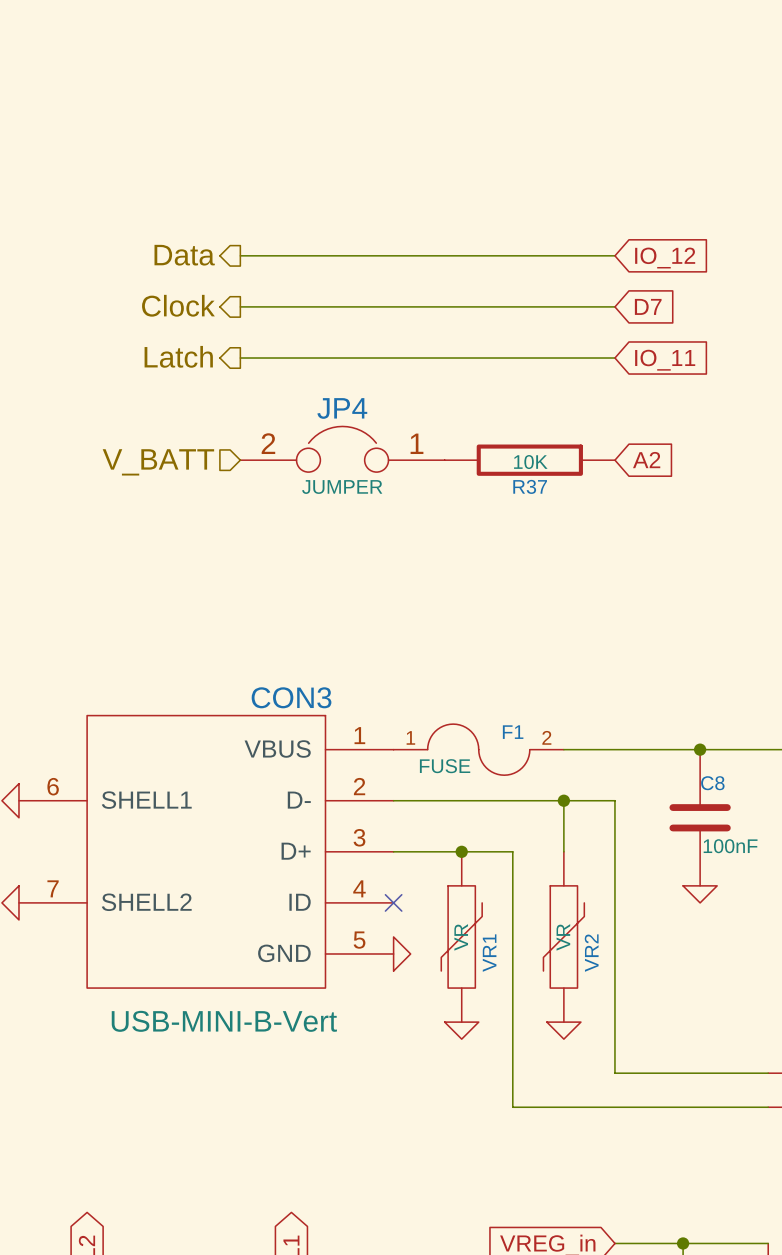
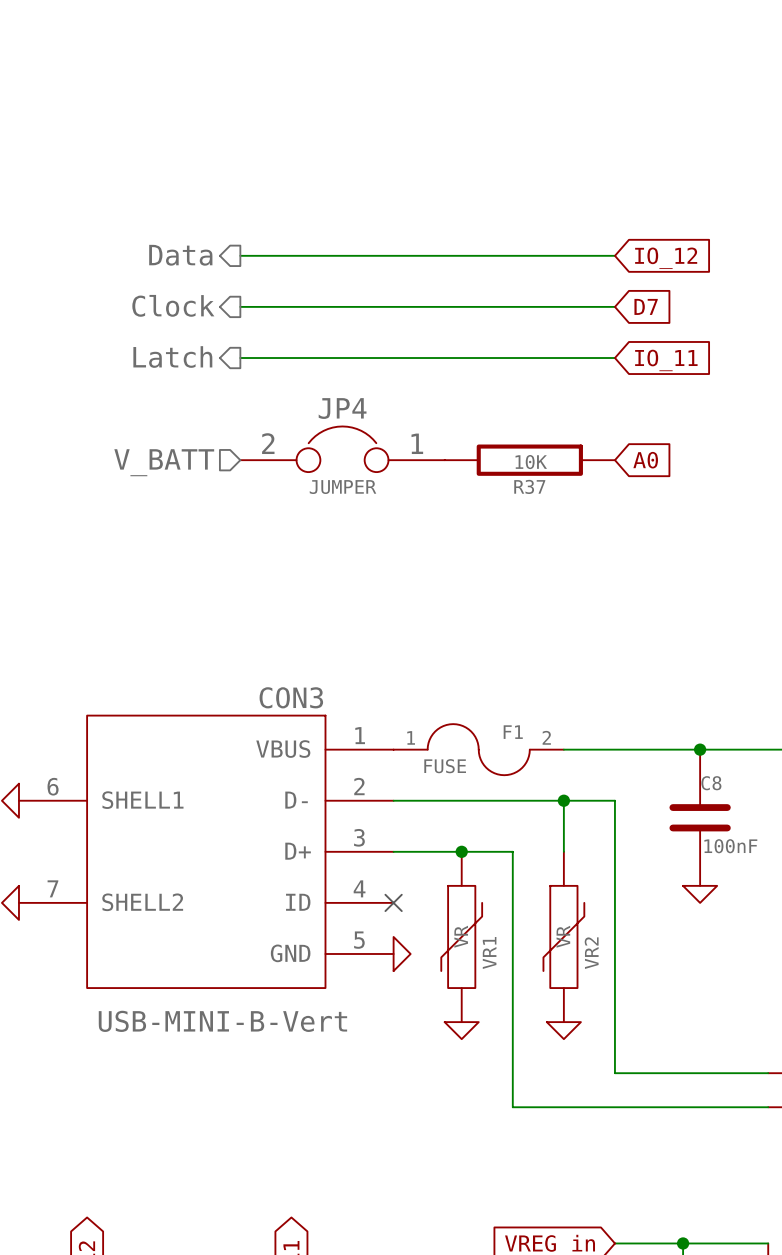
global label: A2 (646, 460) -> A0 (645, 460)

